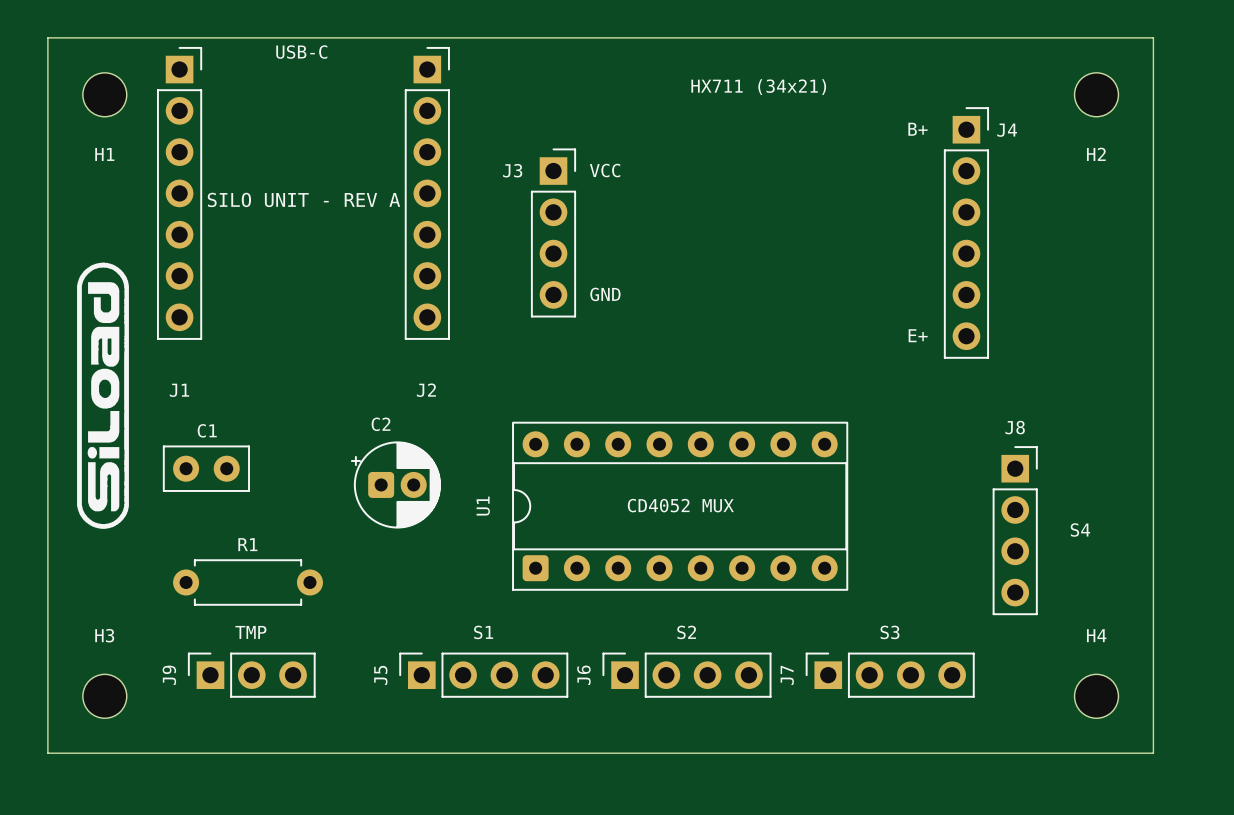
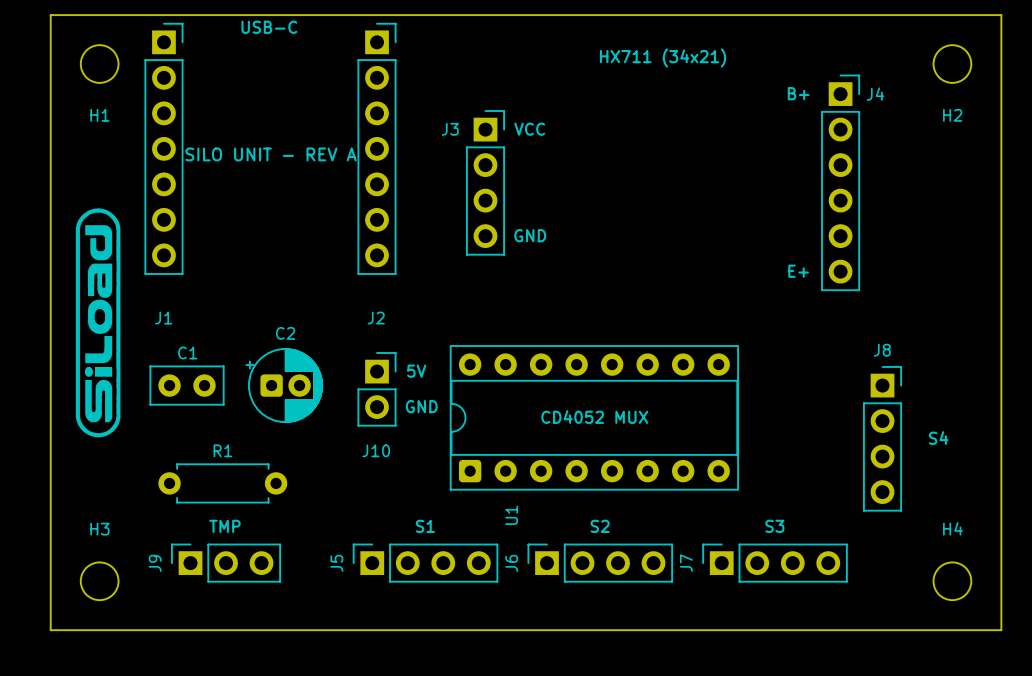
C2 name position: C2 (381, 424) -> C2 (285, 333)
text: none -> 5V (416, 371)
J10: none -> (377, 389)
C2 position: (395, 484) -> (284, 385)
text: none -> GND (421, 406)
U1 name position: U1 (483, 506) -> U1 (511, 515)

